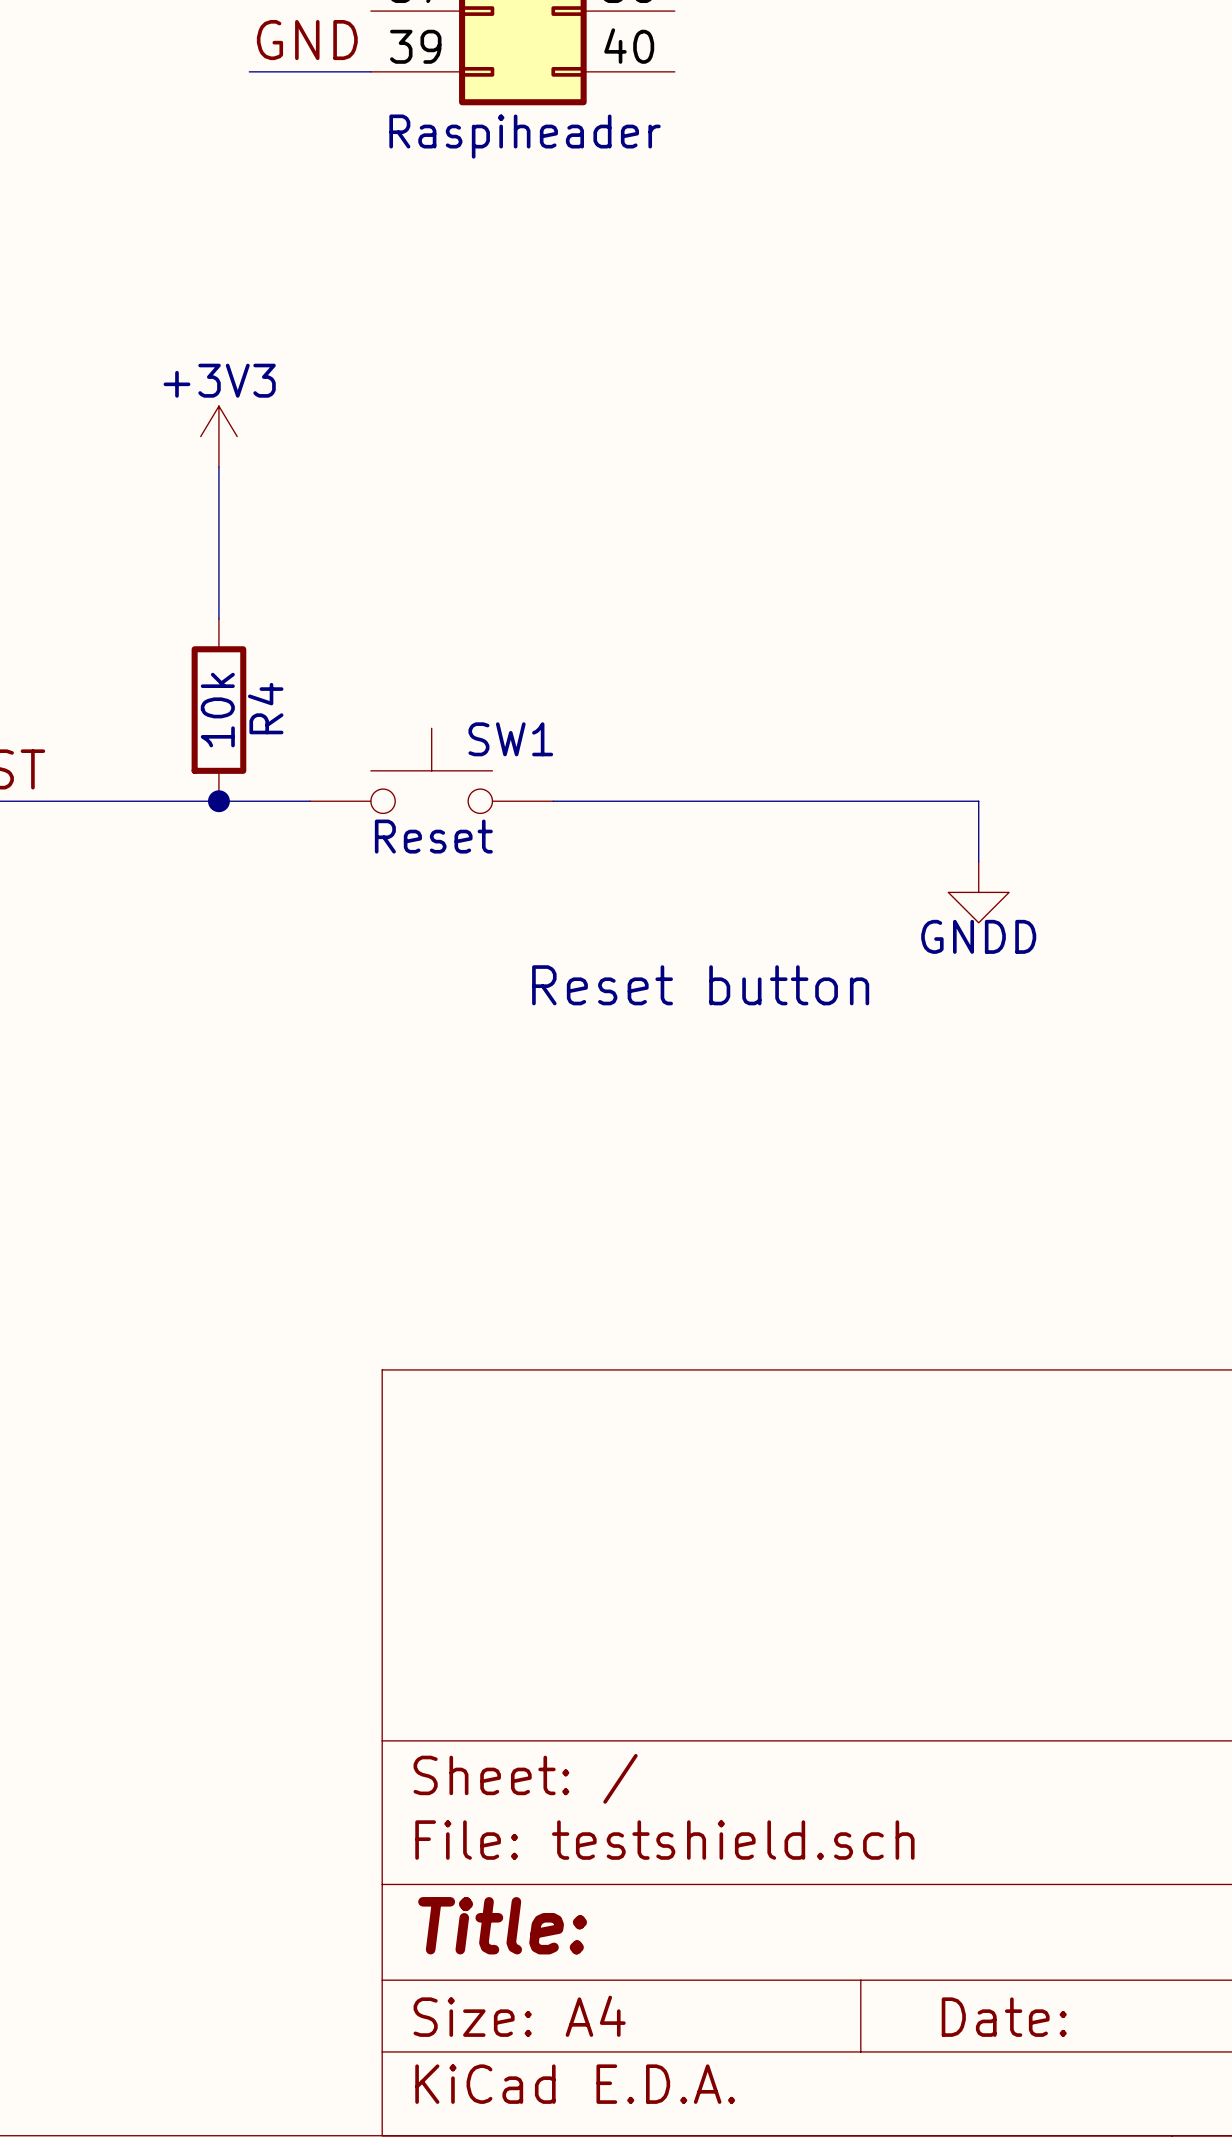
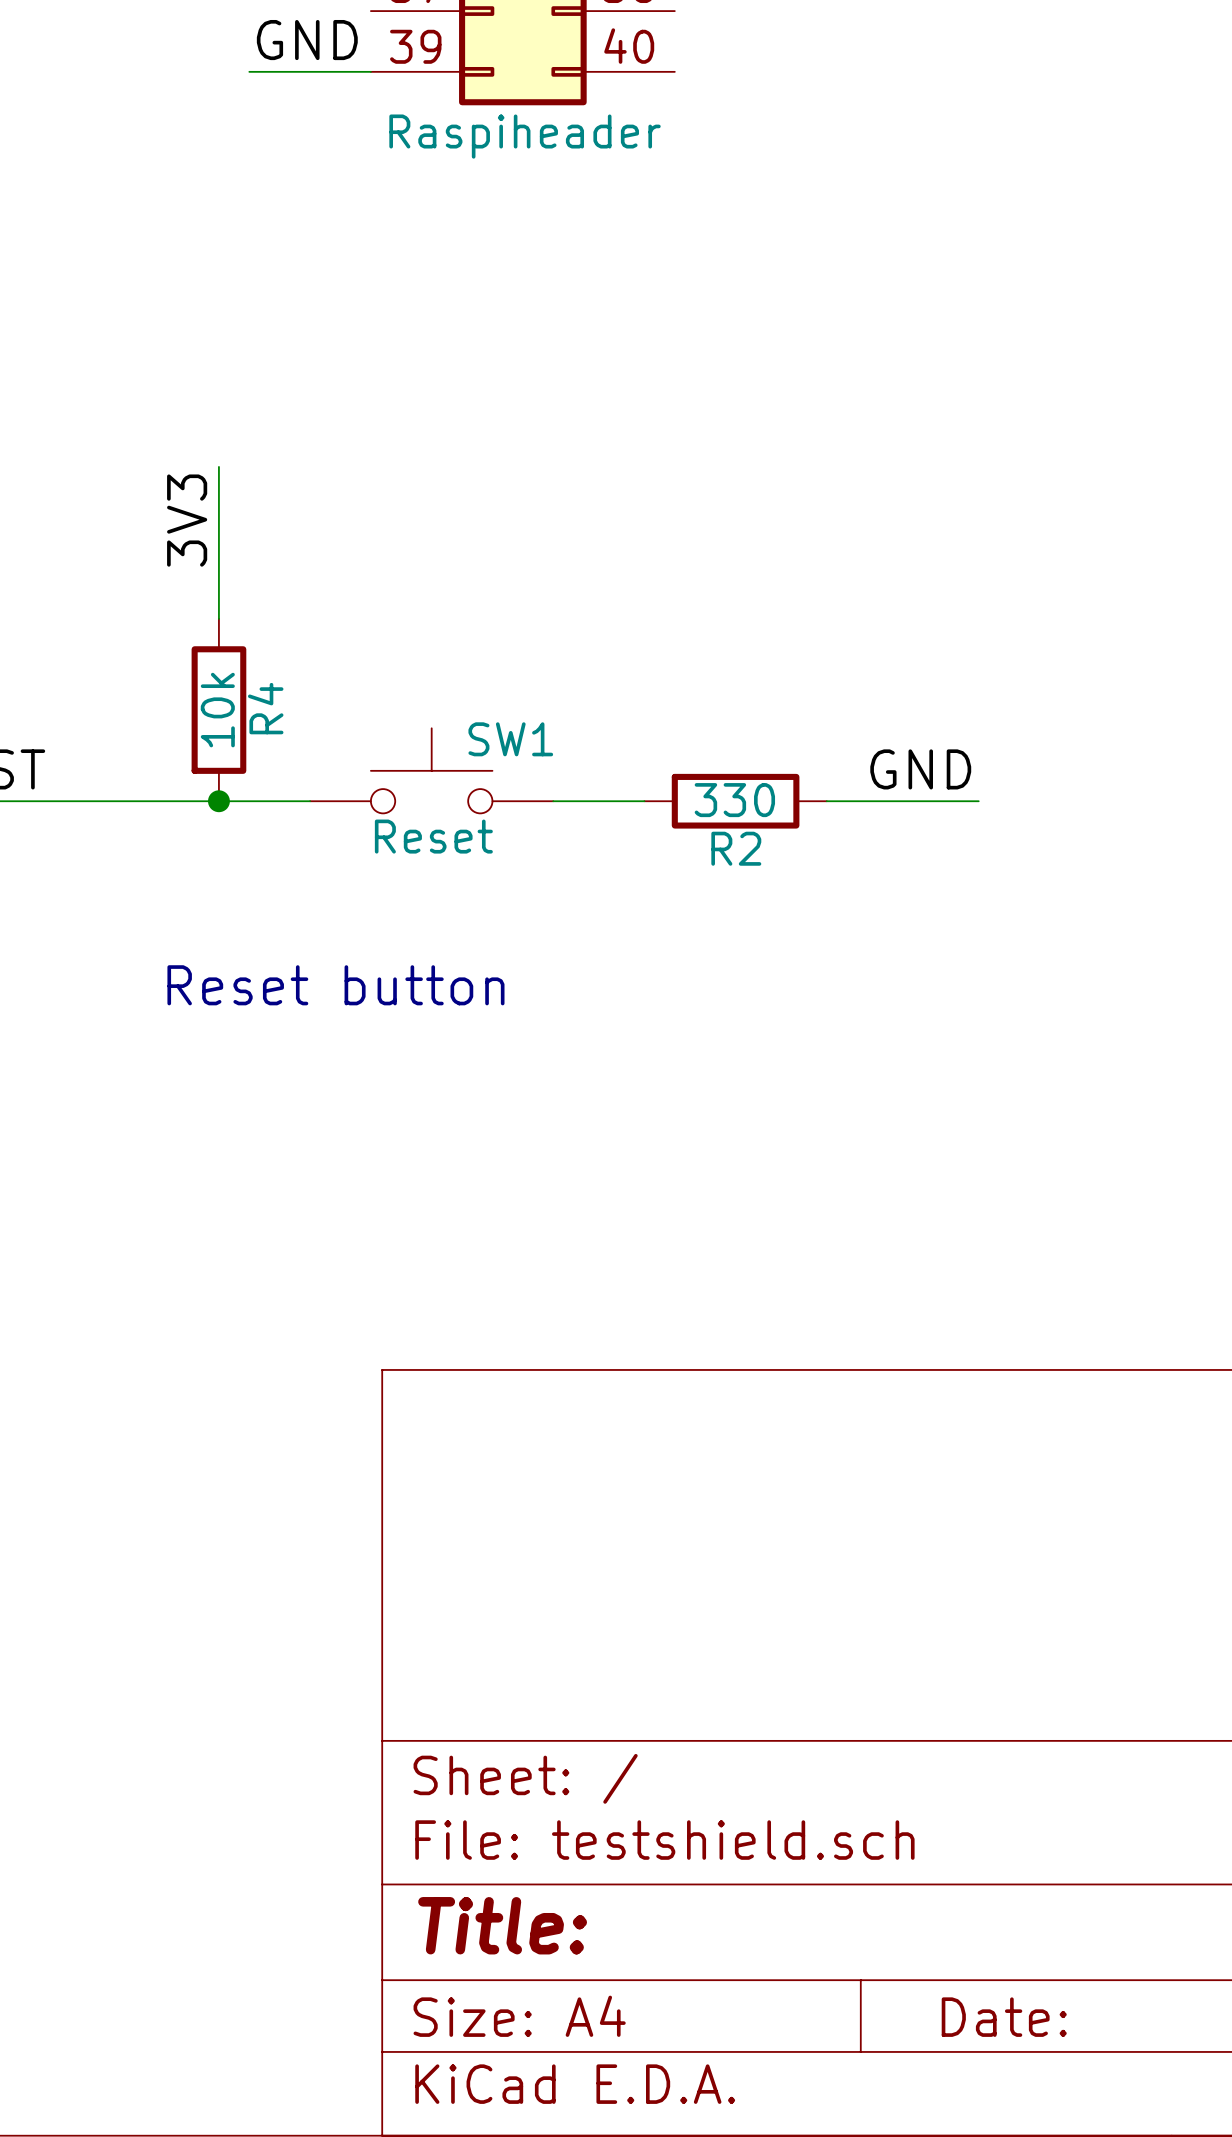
power symbol: +3V3 (218, 436) -> none
label: none -> 3V3 (187, 520)
label: none -> GND (920, 769)
wire: (644, 801) (826, 801) -> none
R2: none -> 330 (735, 801)
wire: (978, 801) (978, 862) -> none
power symbol: GNDD (978, 892) -> none
text position: Reset button (700, 985) -> Reset button (335, 985)

